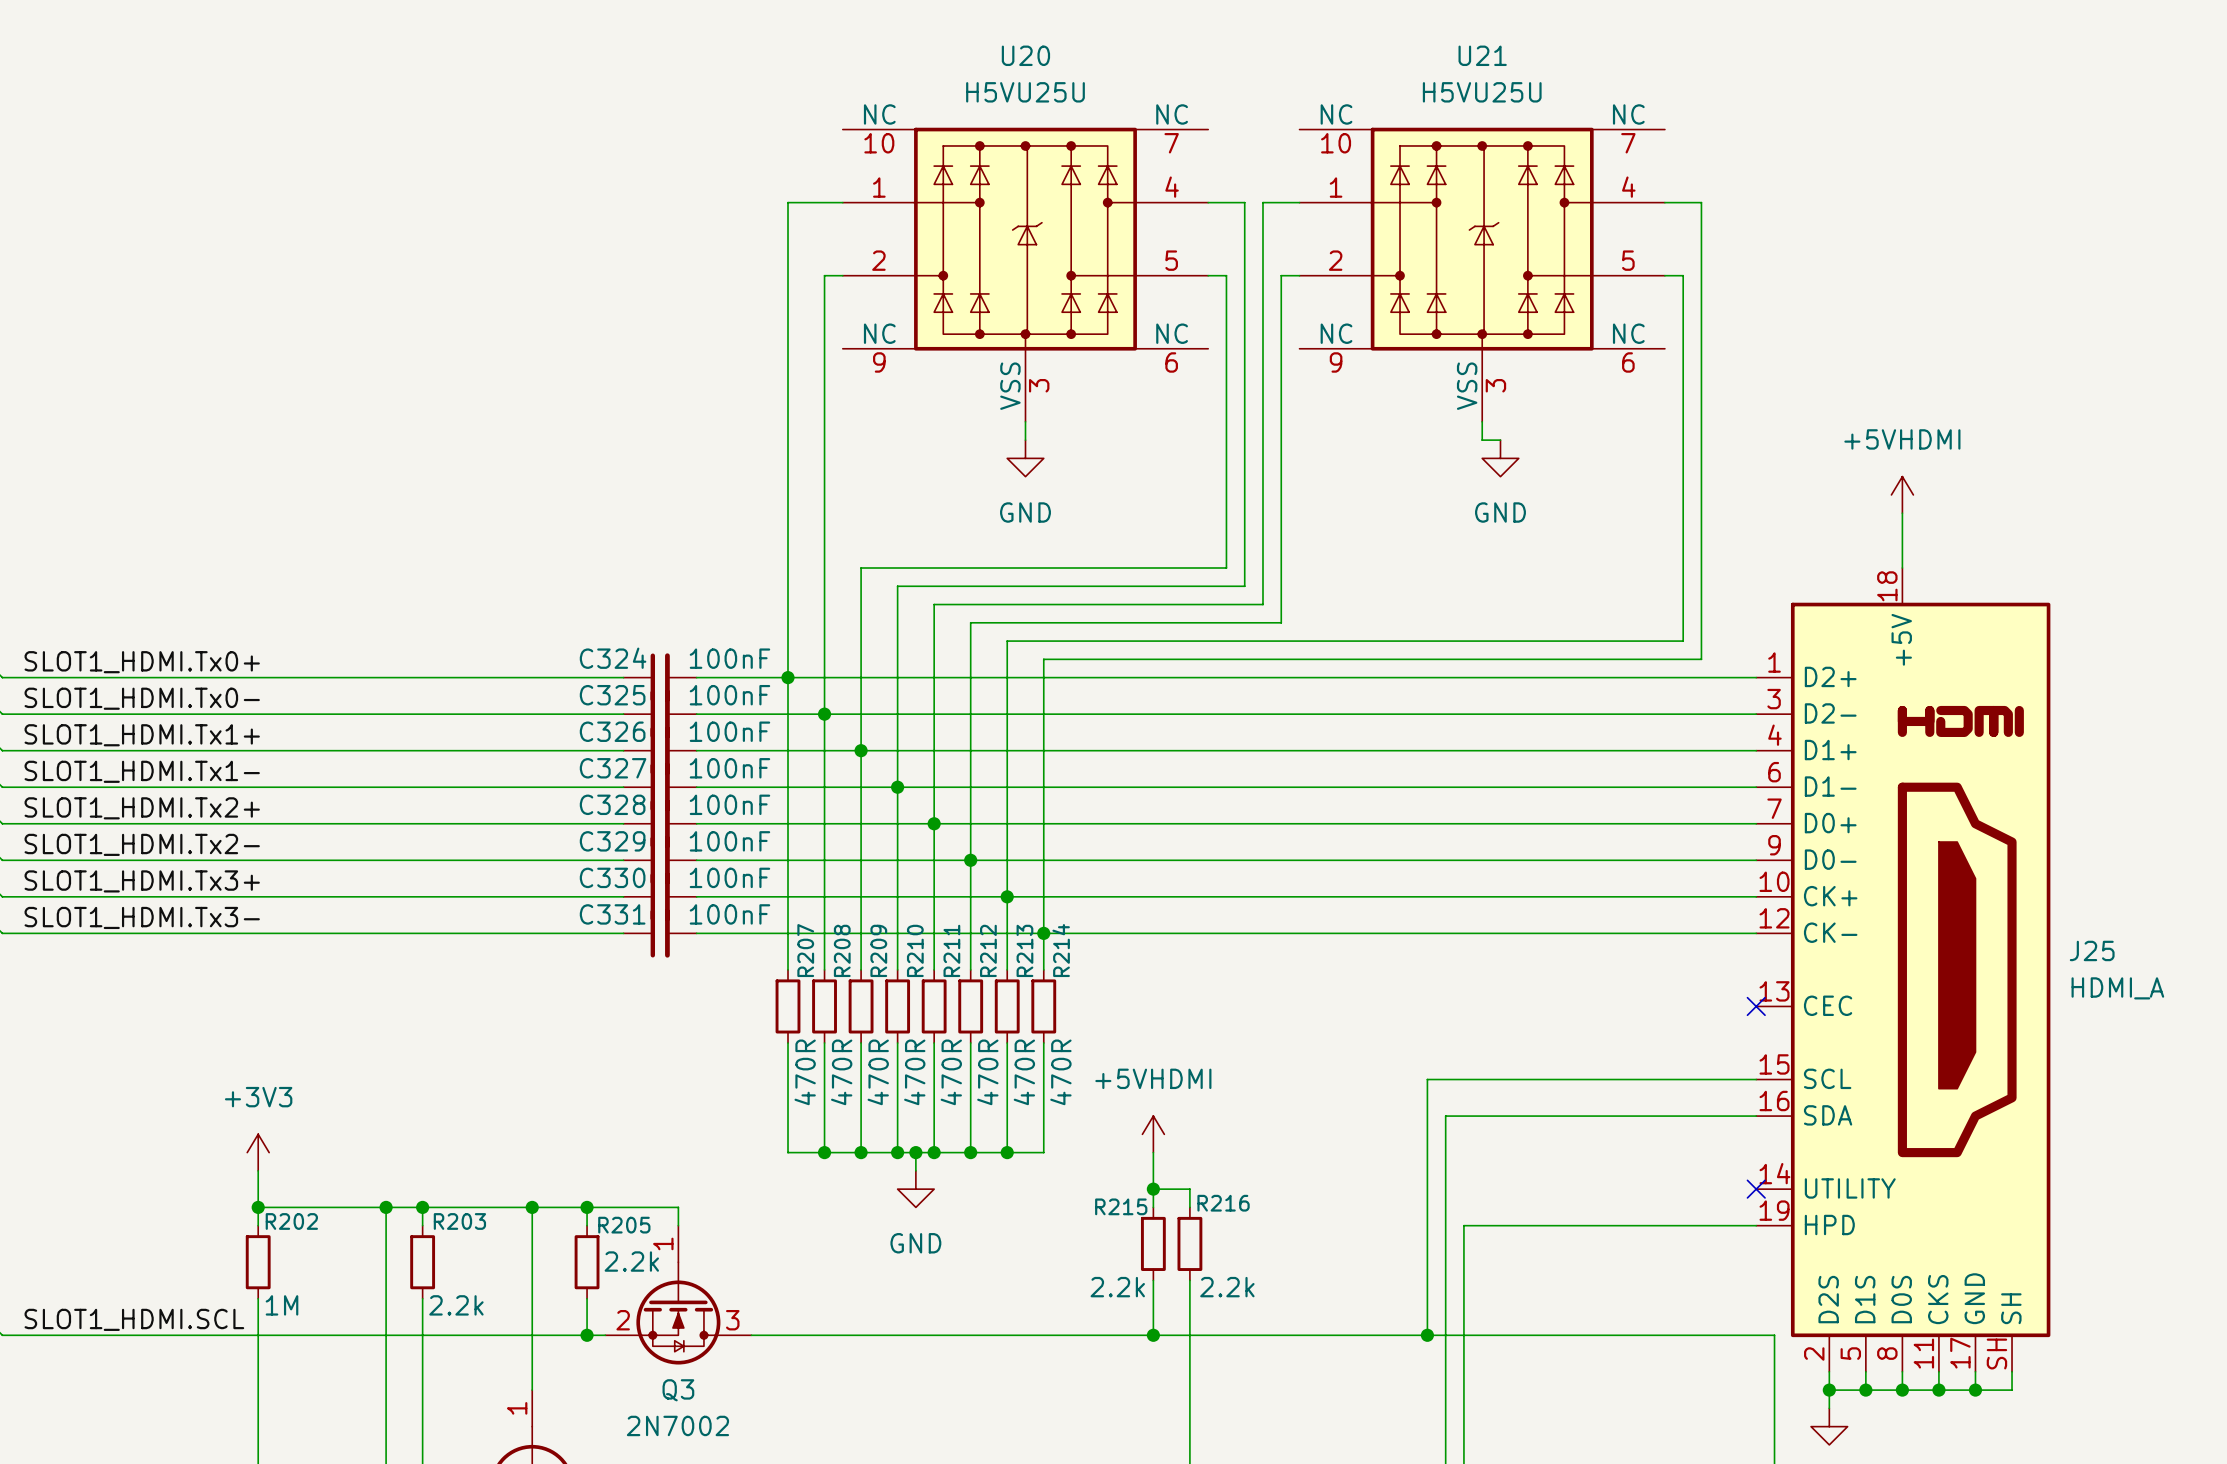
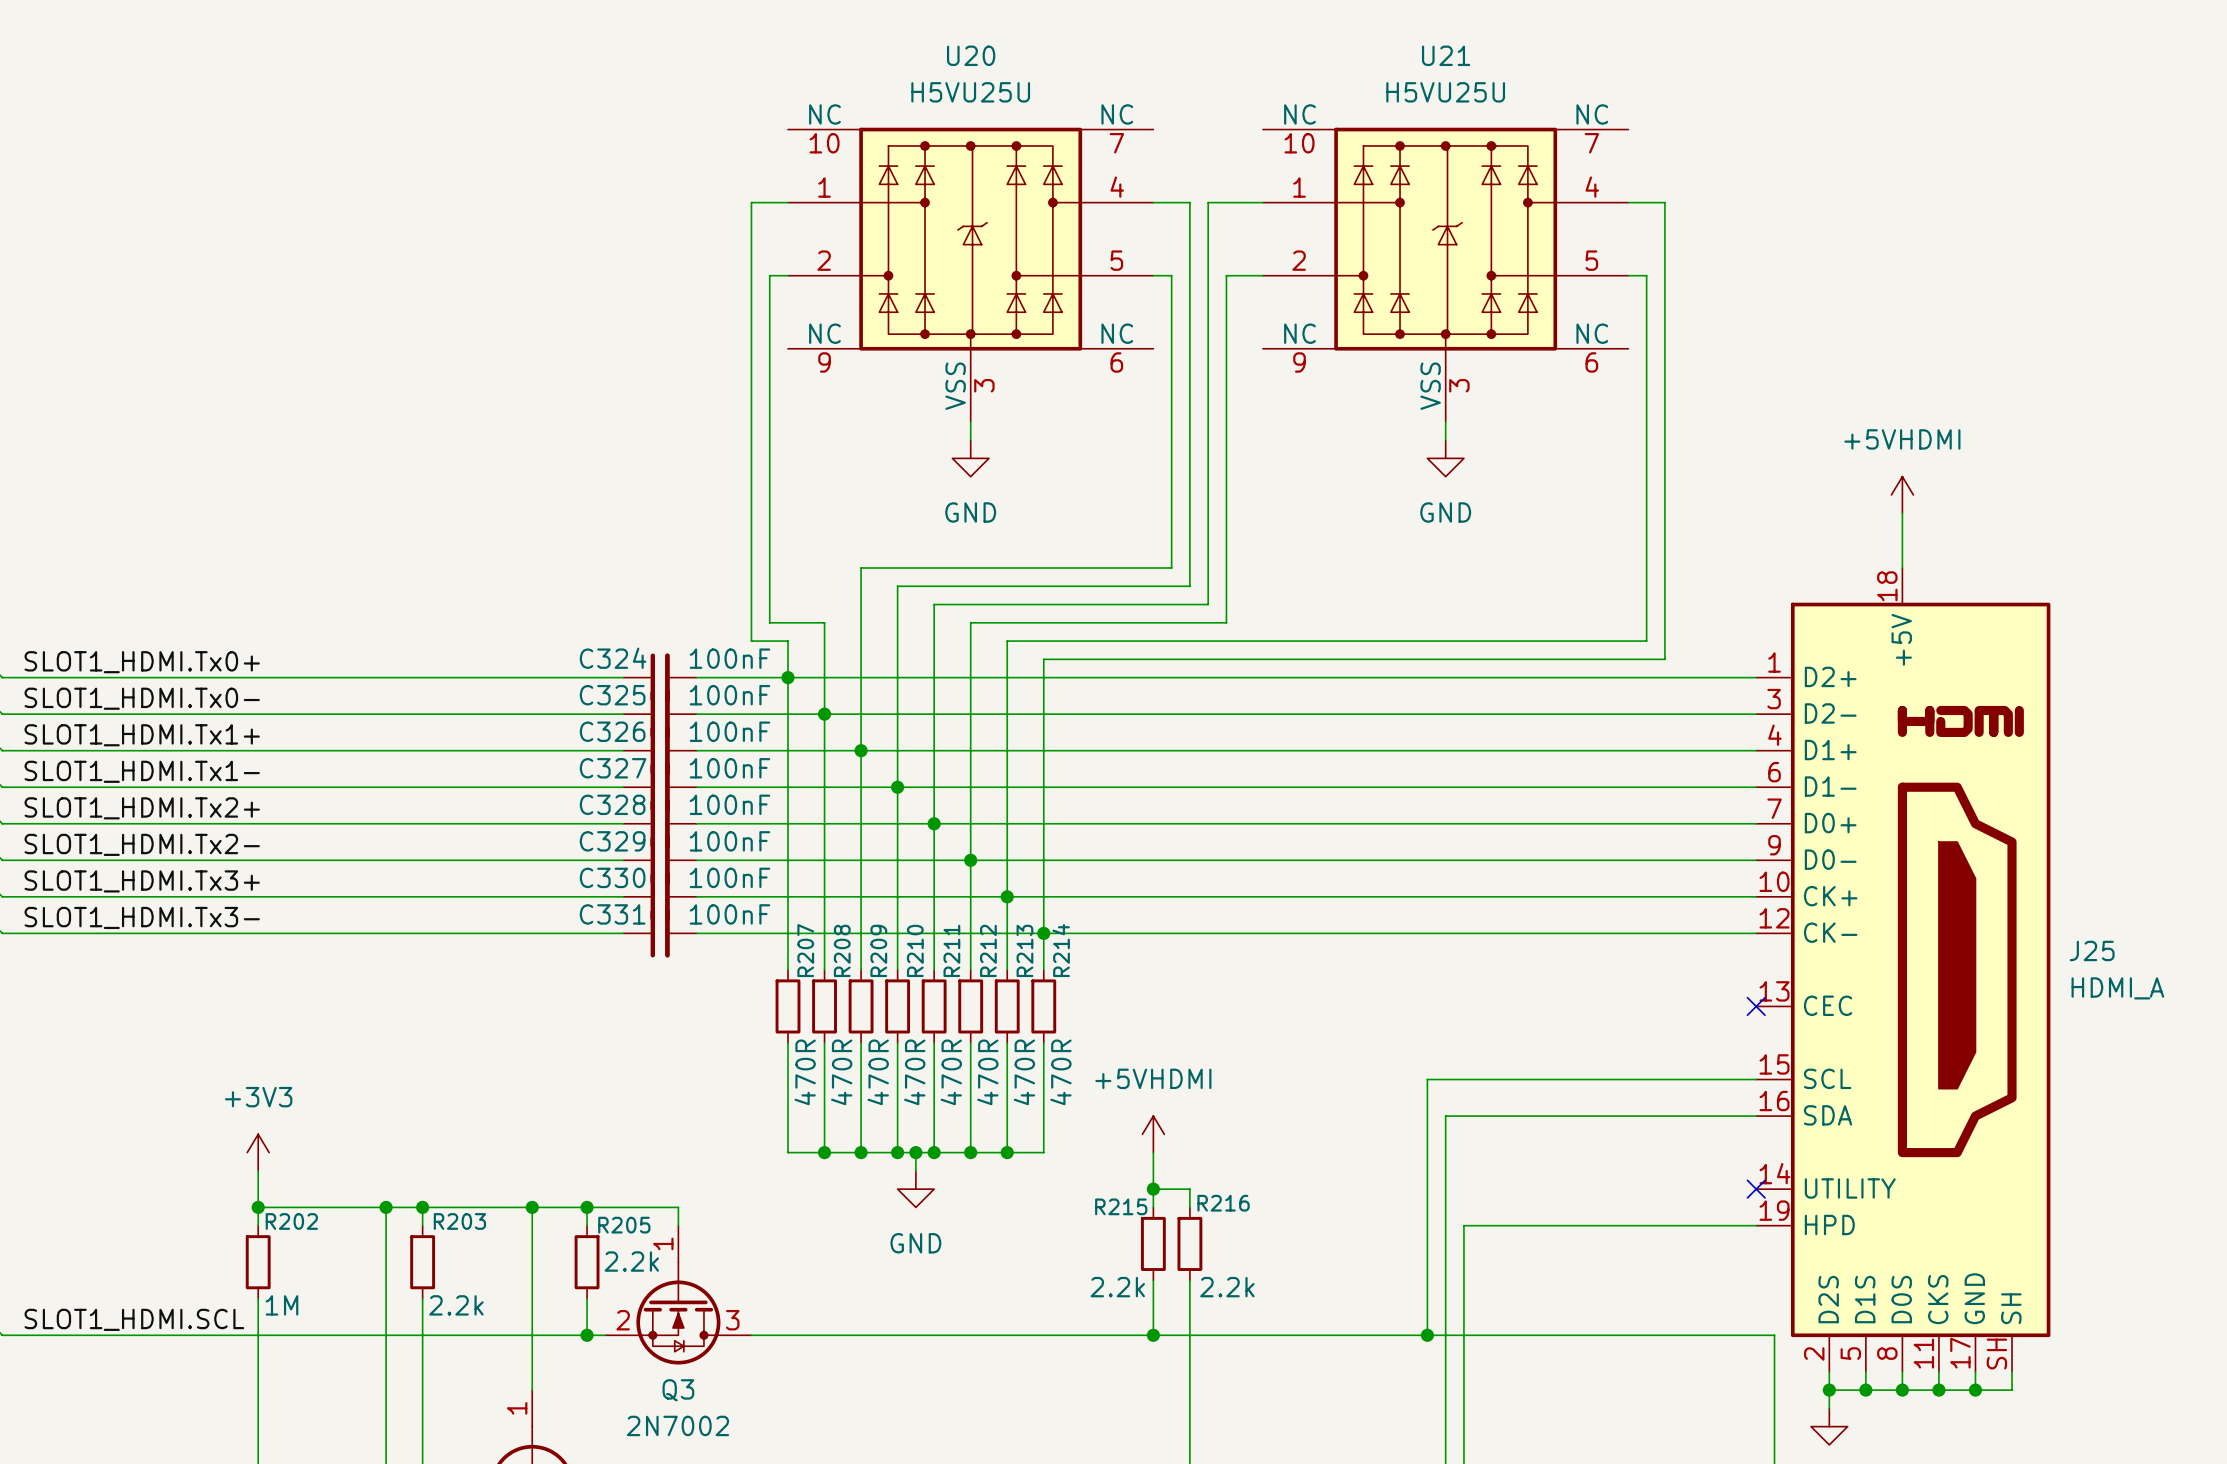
wire: (842, 202) (788, 202) (788, 641) -> (788, 202) (751, 202) (751, 641) (788, 641)
wire: (1244, 202) (1244, 586) (1189, 586) -> (1153, 202) (1189, 202) (1189, 586)
wire: none -> (1244, 202) (1262, 202)
wire: (1299, 202) (1262, 202) (1262, 604) (1208, 604) -> (1208, 202) (1208, 604)
wire: (1664, 202) (1701, 202) (1701, 659) (1664, 659) -> (1628, 202) (1664, 202) (1664, 659)
U20 position: (1025, 274) -> (970, 274)
U21 position: (1482, 274) -> (1445, 274)
wire: (842, 275) (824, 275) (824, 622) -> (788, 275) (769, 275) (769, 622) (824, 622)
wire: none -> (1153, 275) (1171, 275) (1171, 568)
wire: (1208, 275) (1226, 275) -> (1262, 275) (1226, 275)
wire: (1299, 275) (1281, 275) (1281, 622) (1226, 622) -> none
wire: (1664, 275) (1683, 275) (1683, 641) (1646, 641) -> (1628, 275) (1646, 275) (1646, 641)
wire: (1025, 421) (1025, 440) -> (970, 421) (970, 440)
wire: none -> (1445, 421) (1445, 440)
wire: (1482, 421) (1482, 440) (1500, 440) -> none
power symbol position: GND (1025, 458) -> GND (970, 458)
power symbol position: GND (1500, 458) -> GND (1445, 458)
wire: (1171, 568) (1226, 568) -> (1226, 622) (1226, 568)

